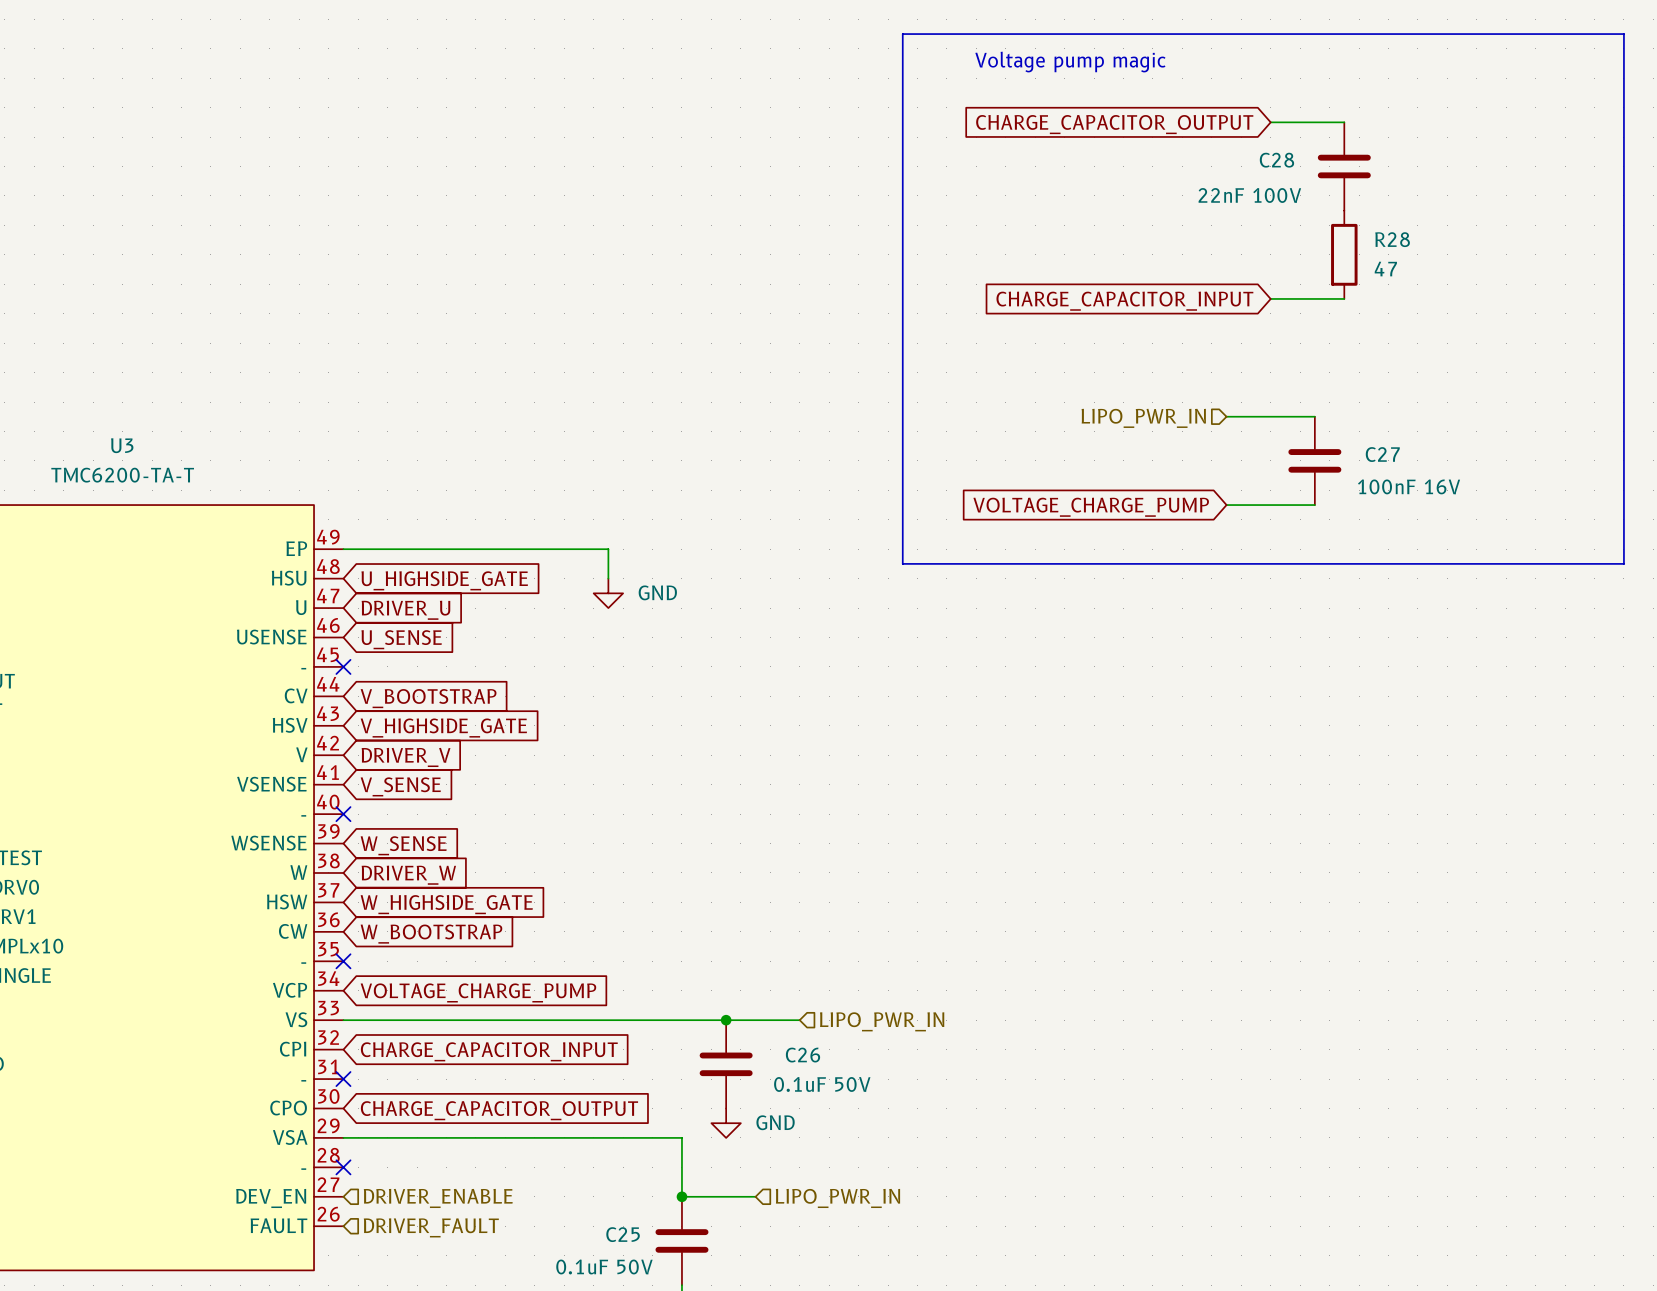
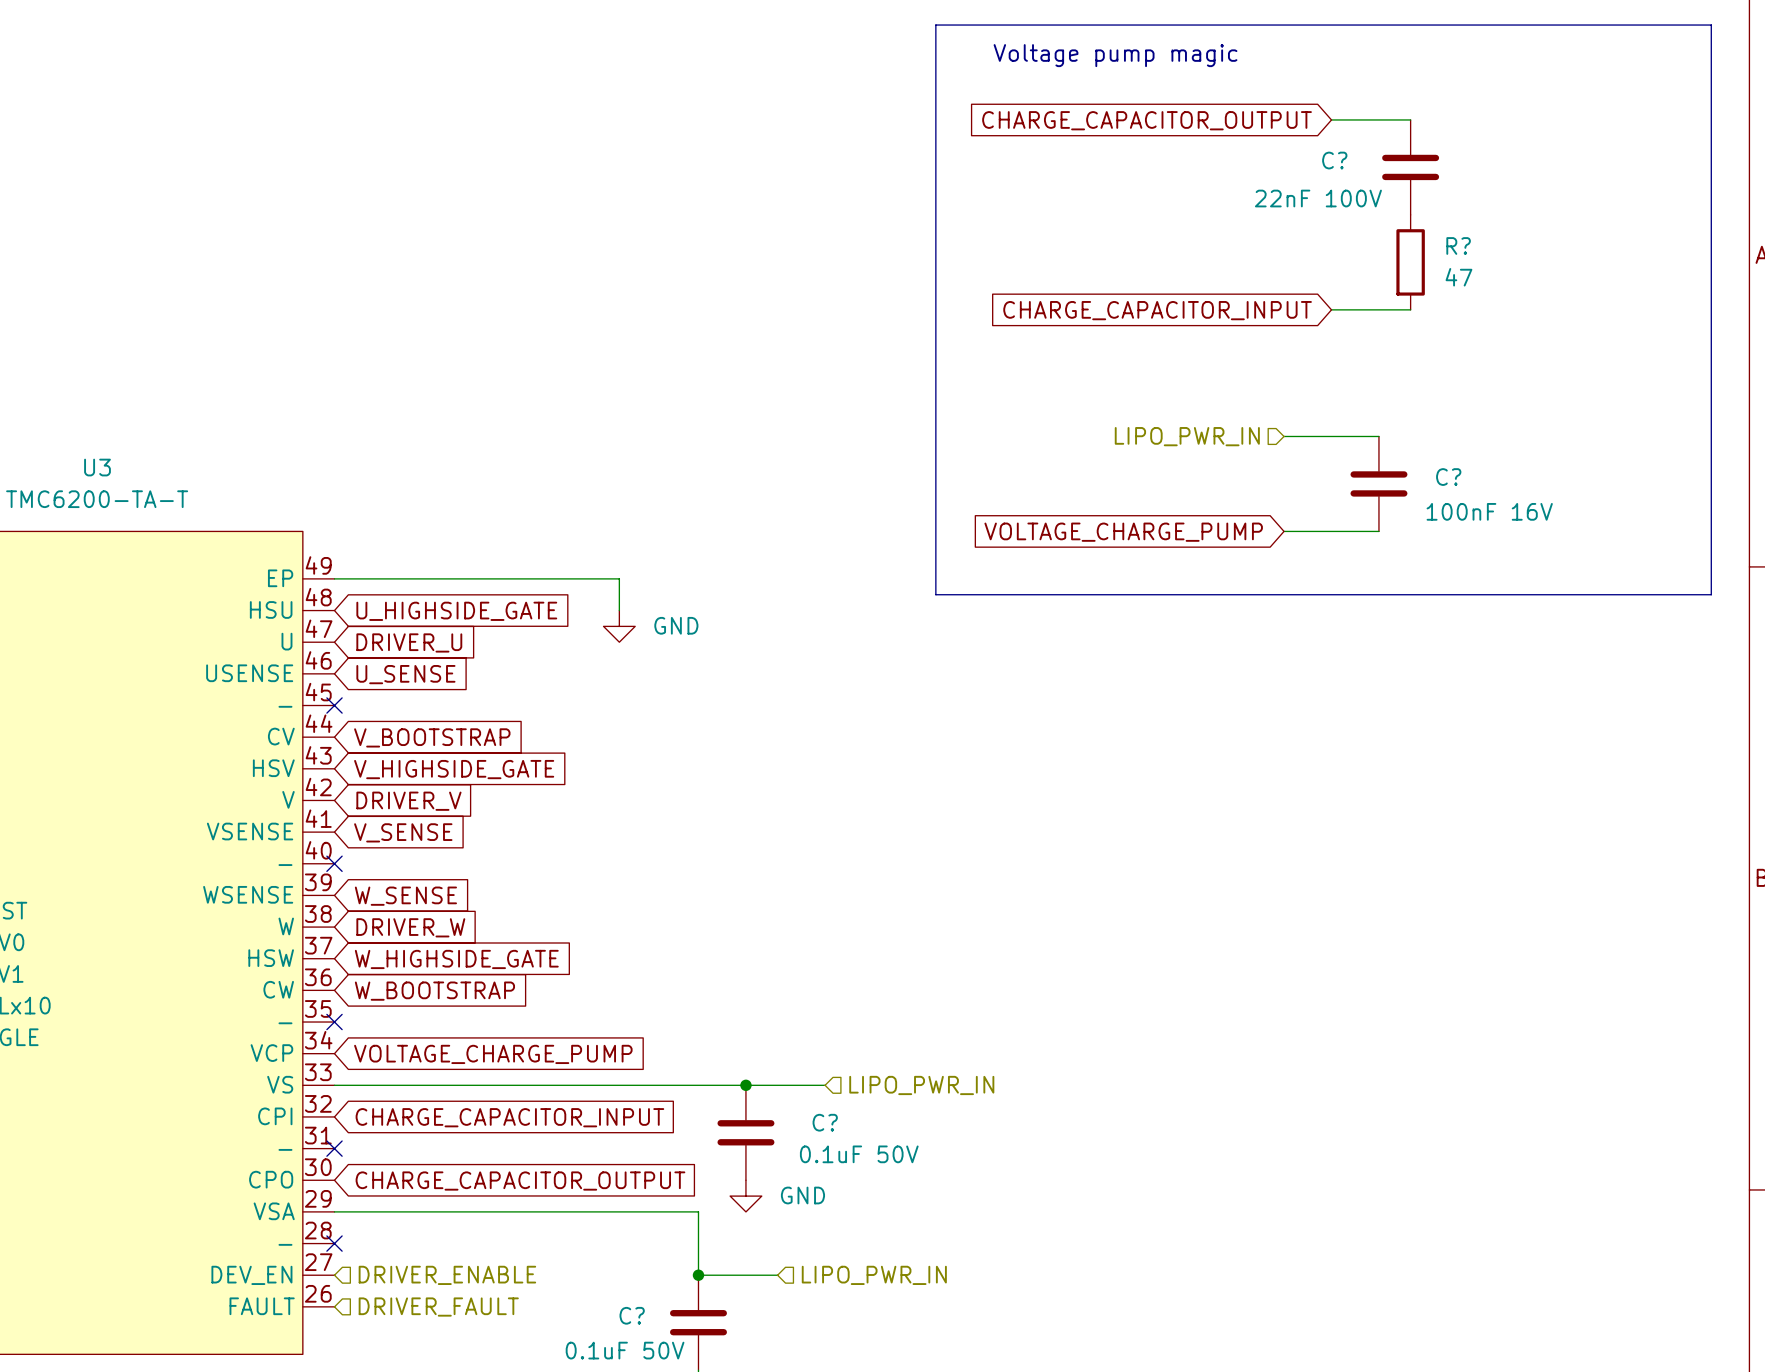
C28 name: C28 (1276, 160) -> C? (1334, 160)
R28 name: R28 (1392, 239) -> R? (1458, 245)
C27 name: C27 (1382, 454) -> C? (1448, 477)
C26 name: C26 (803, 1055) -> C? (825, 1122)
C25 name: C25 (623, 1234) -> C? (632, 1315)

